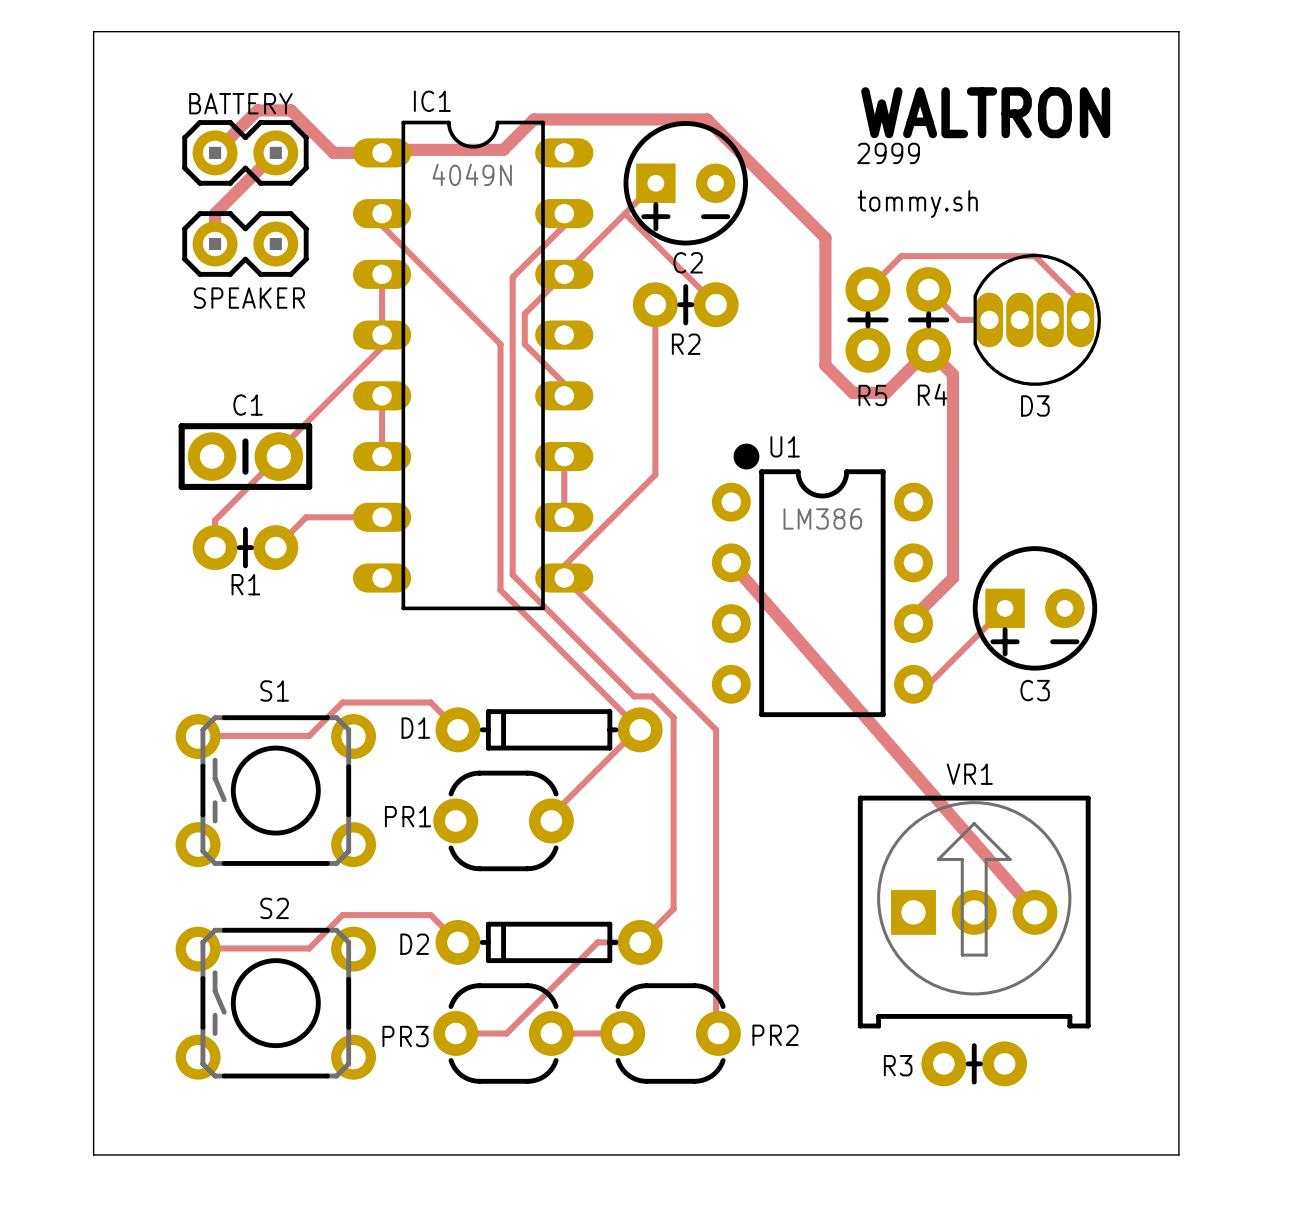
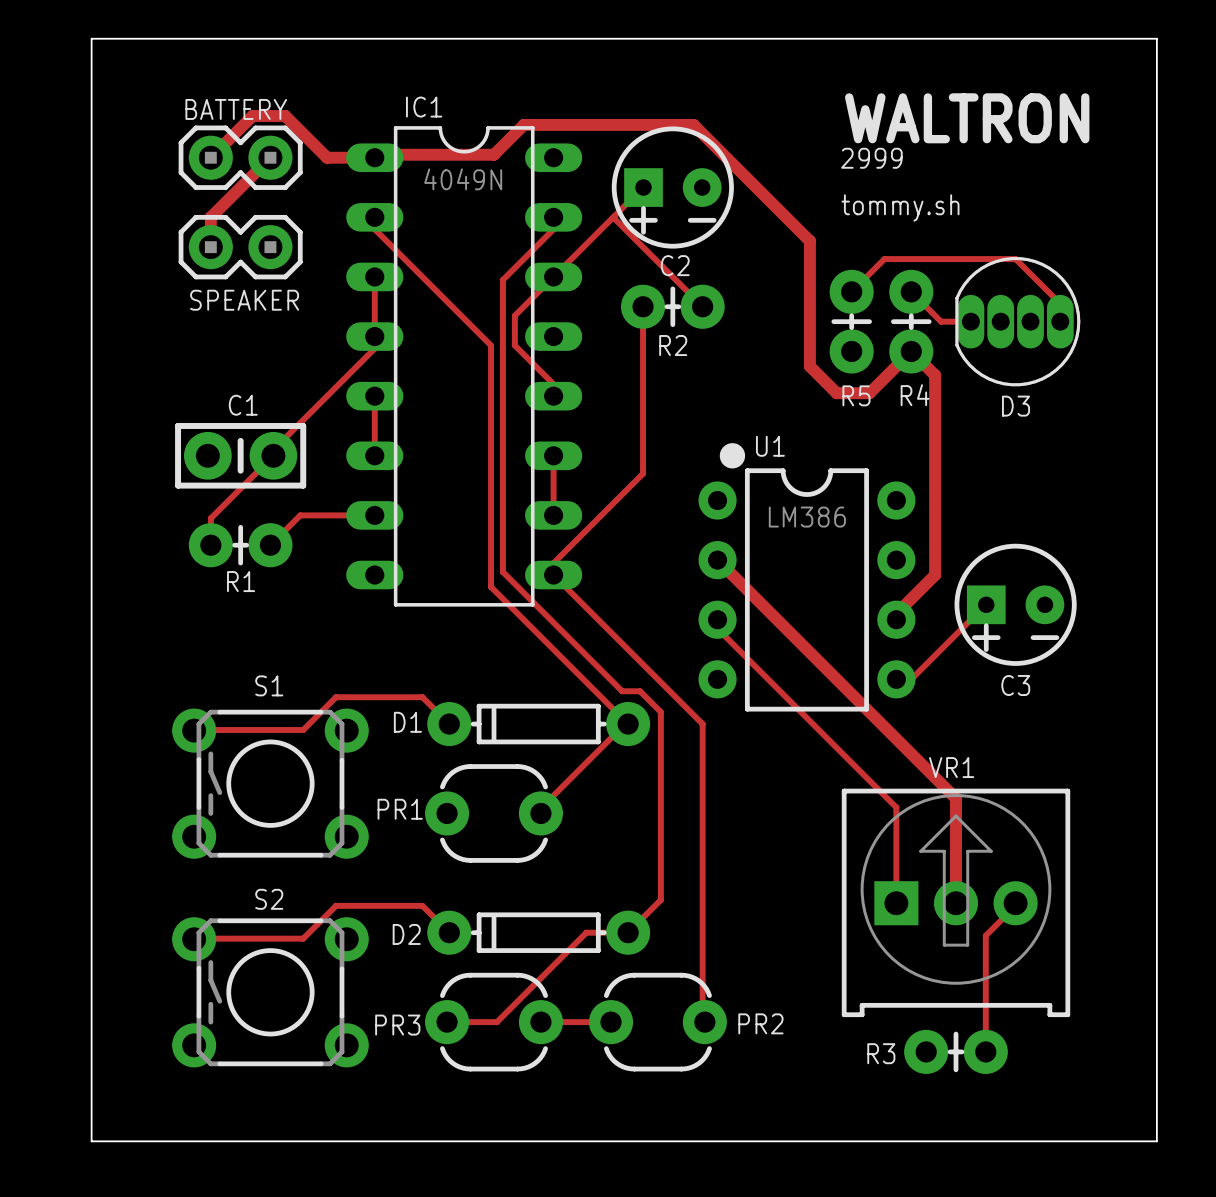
track: (731, 562) (1036, 913) -> (717, 560) (956, 798) (956, 903)
track: none -> (717, 619) (717, 628) (896, 807) (896, 903)
track: none -> (1015, 903) (1015, 905) (985, 935) (985, 1051)

